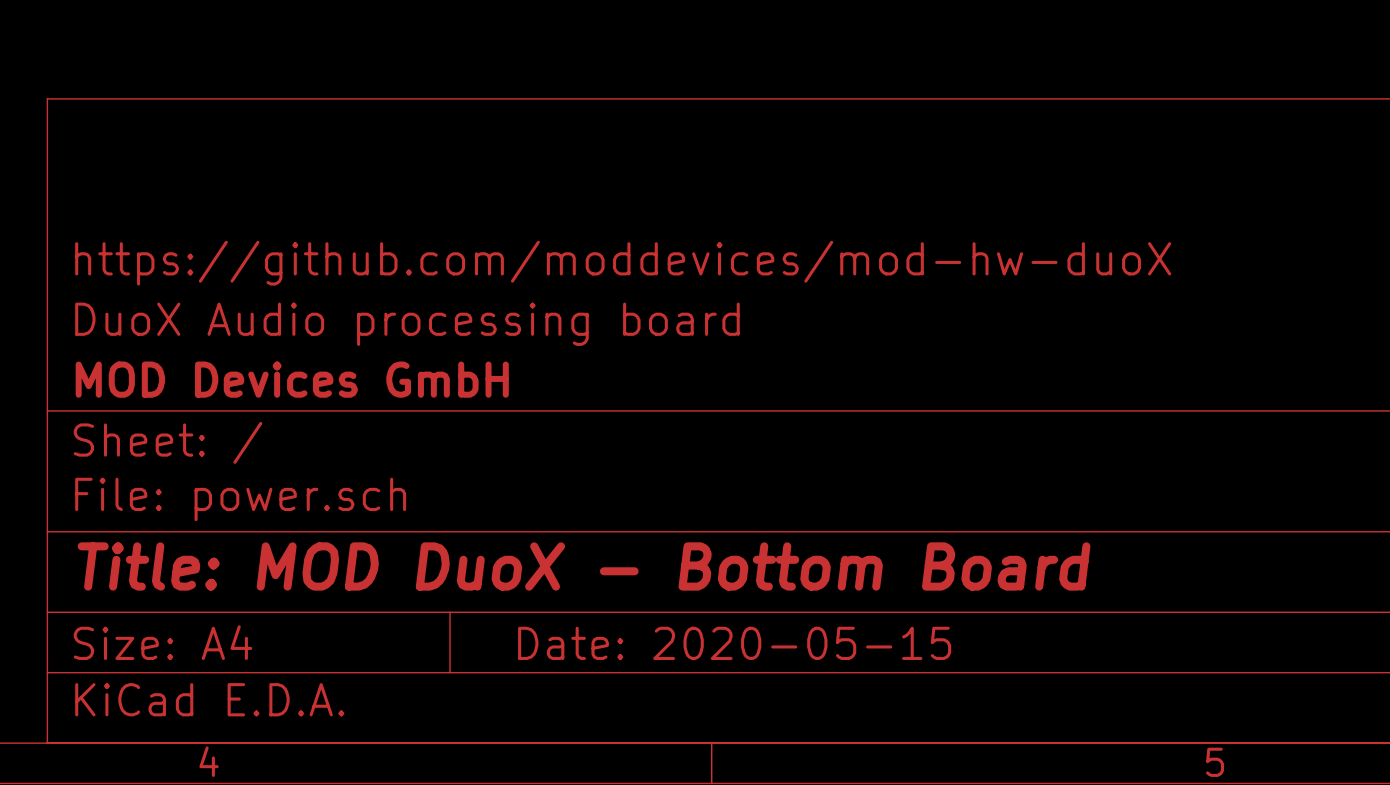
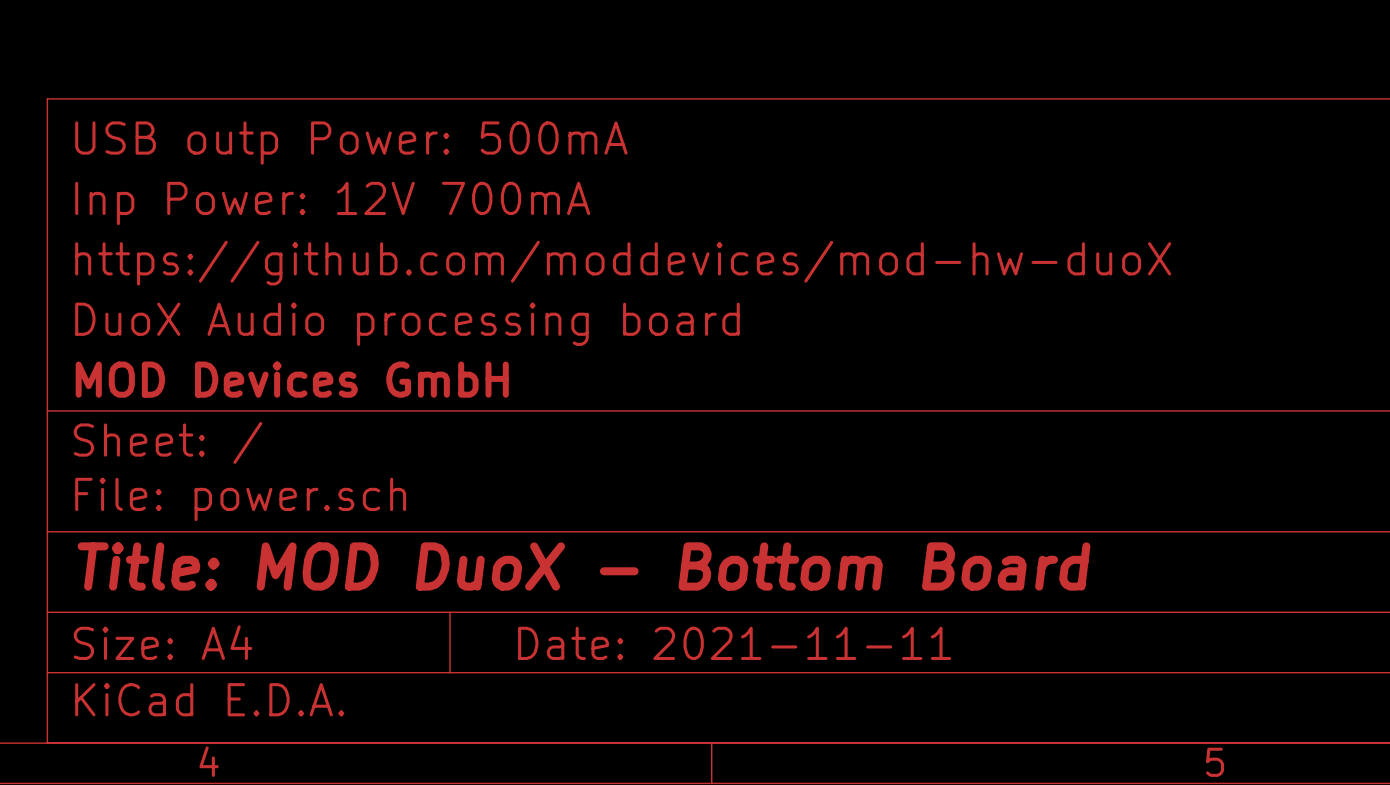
title block: none -> USB outp Power: 500mA (351, 143)
title block: none -> Inp Power: 12V 700mA (332, 203)
title block: Date: 2020-05-15 (734, 643) -> Date: 2021-11-11 (734, 643)

